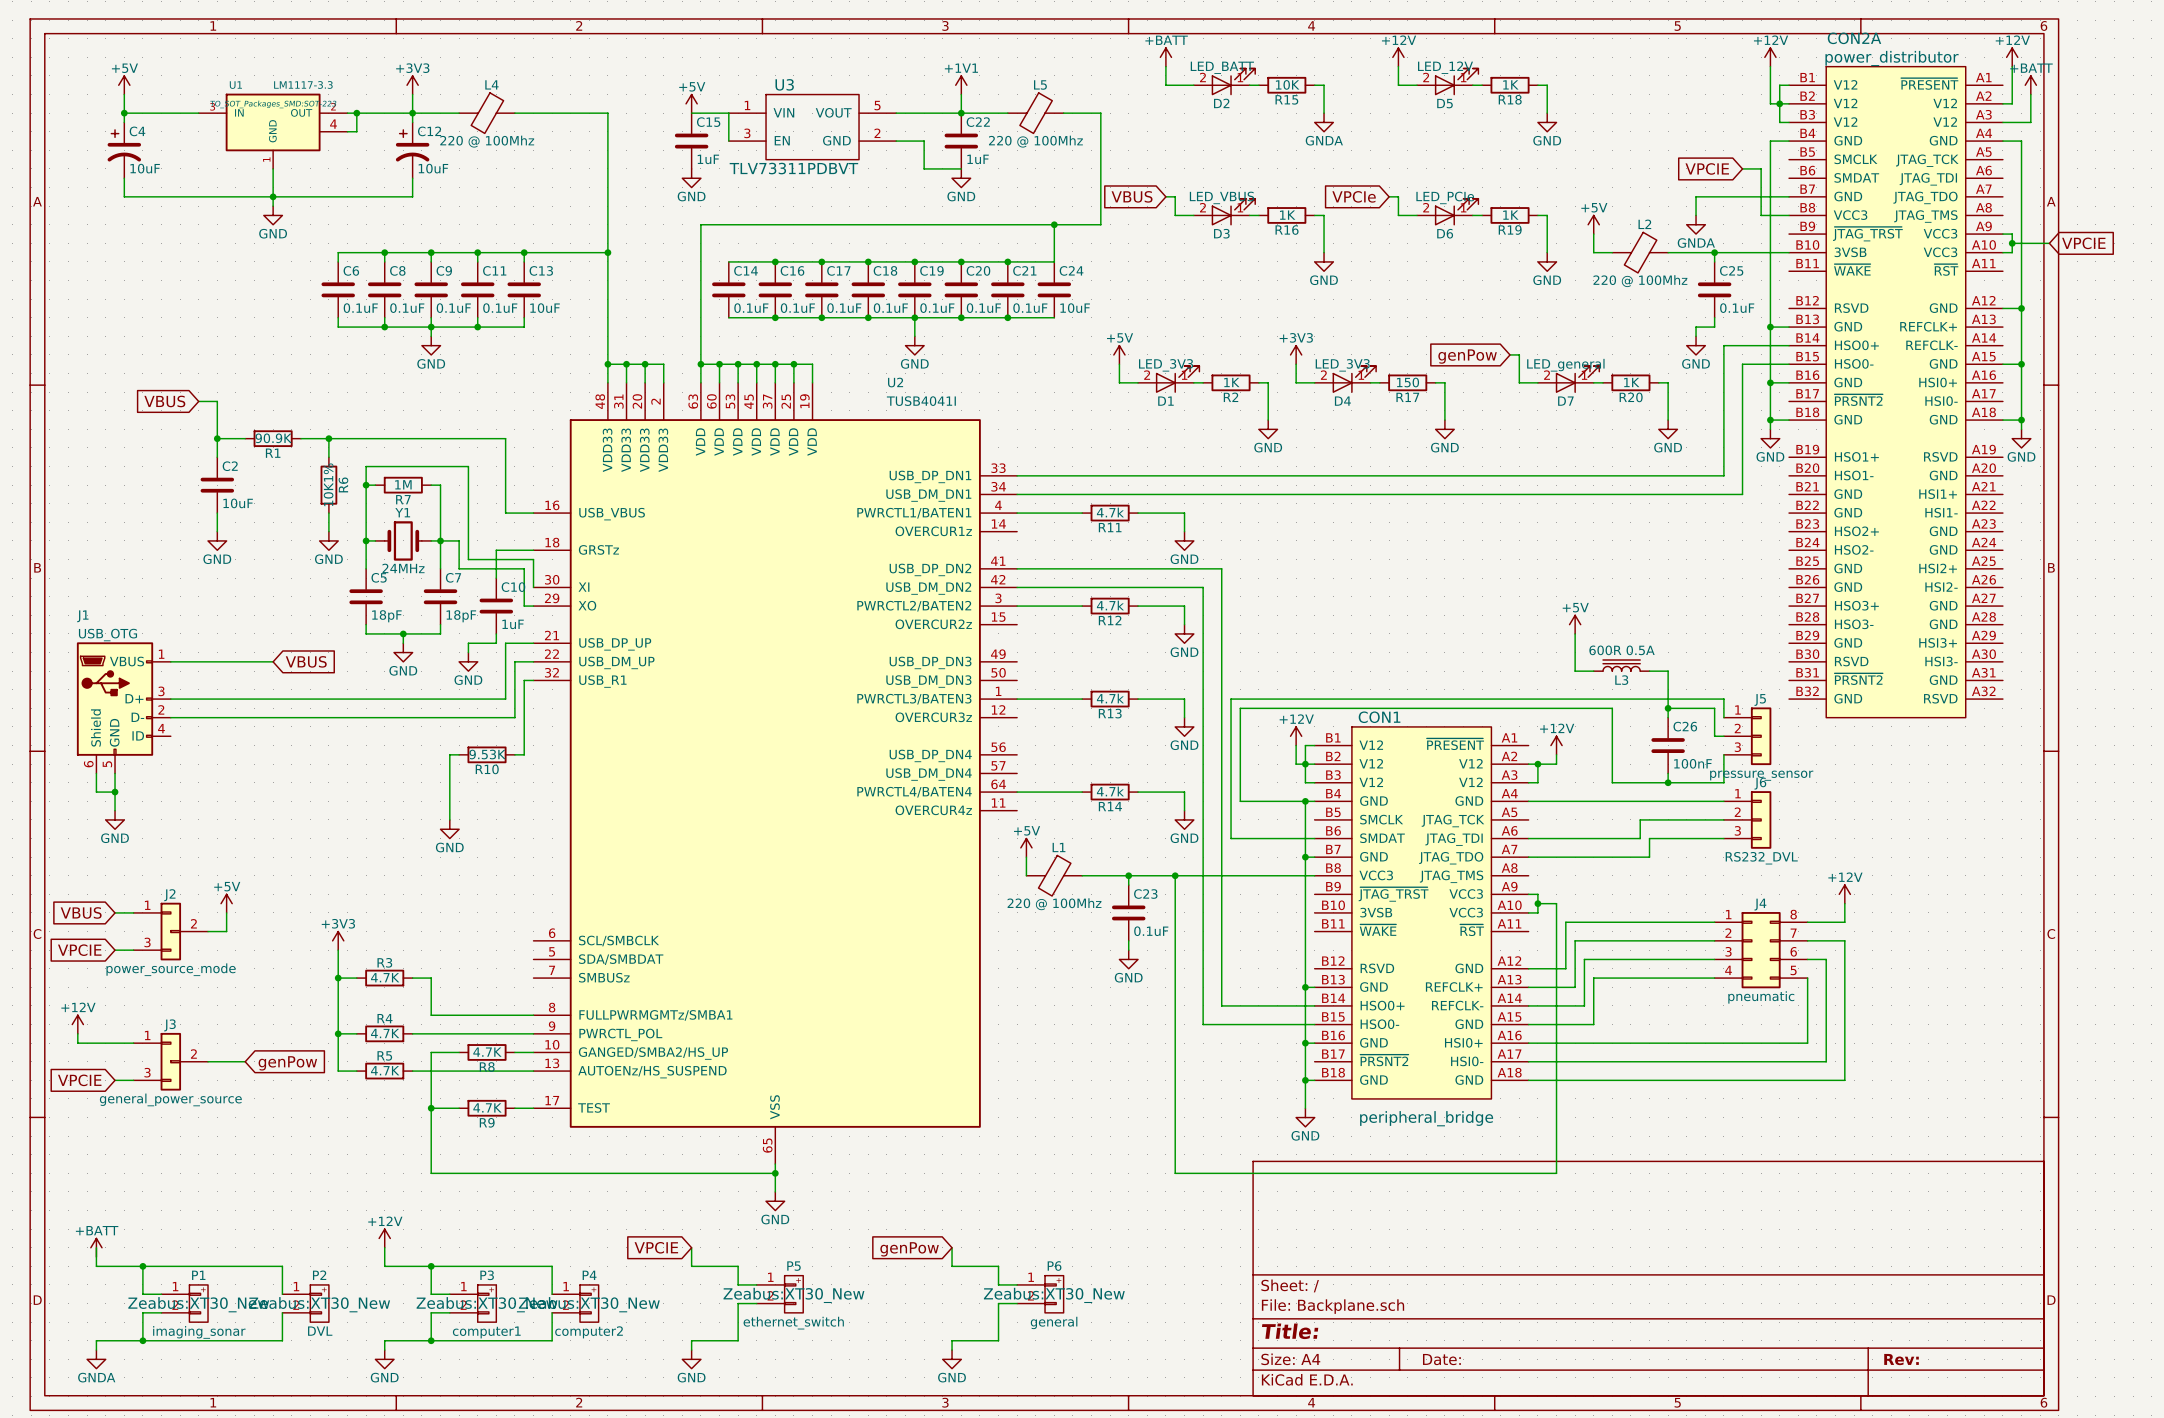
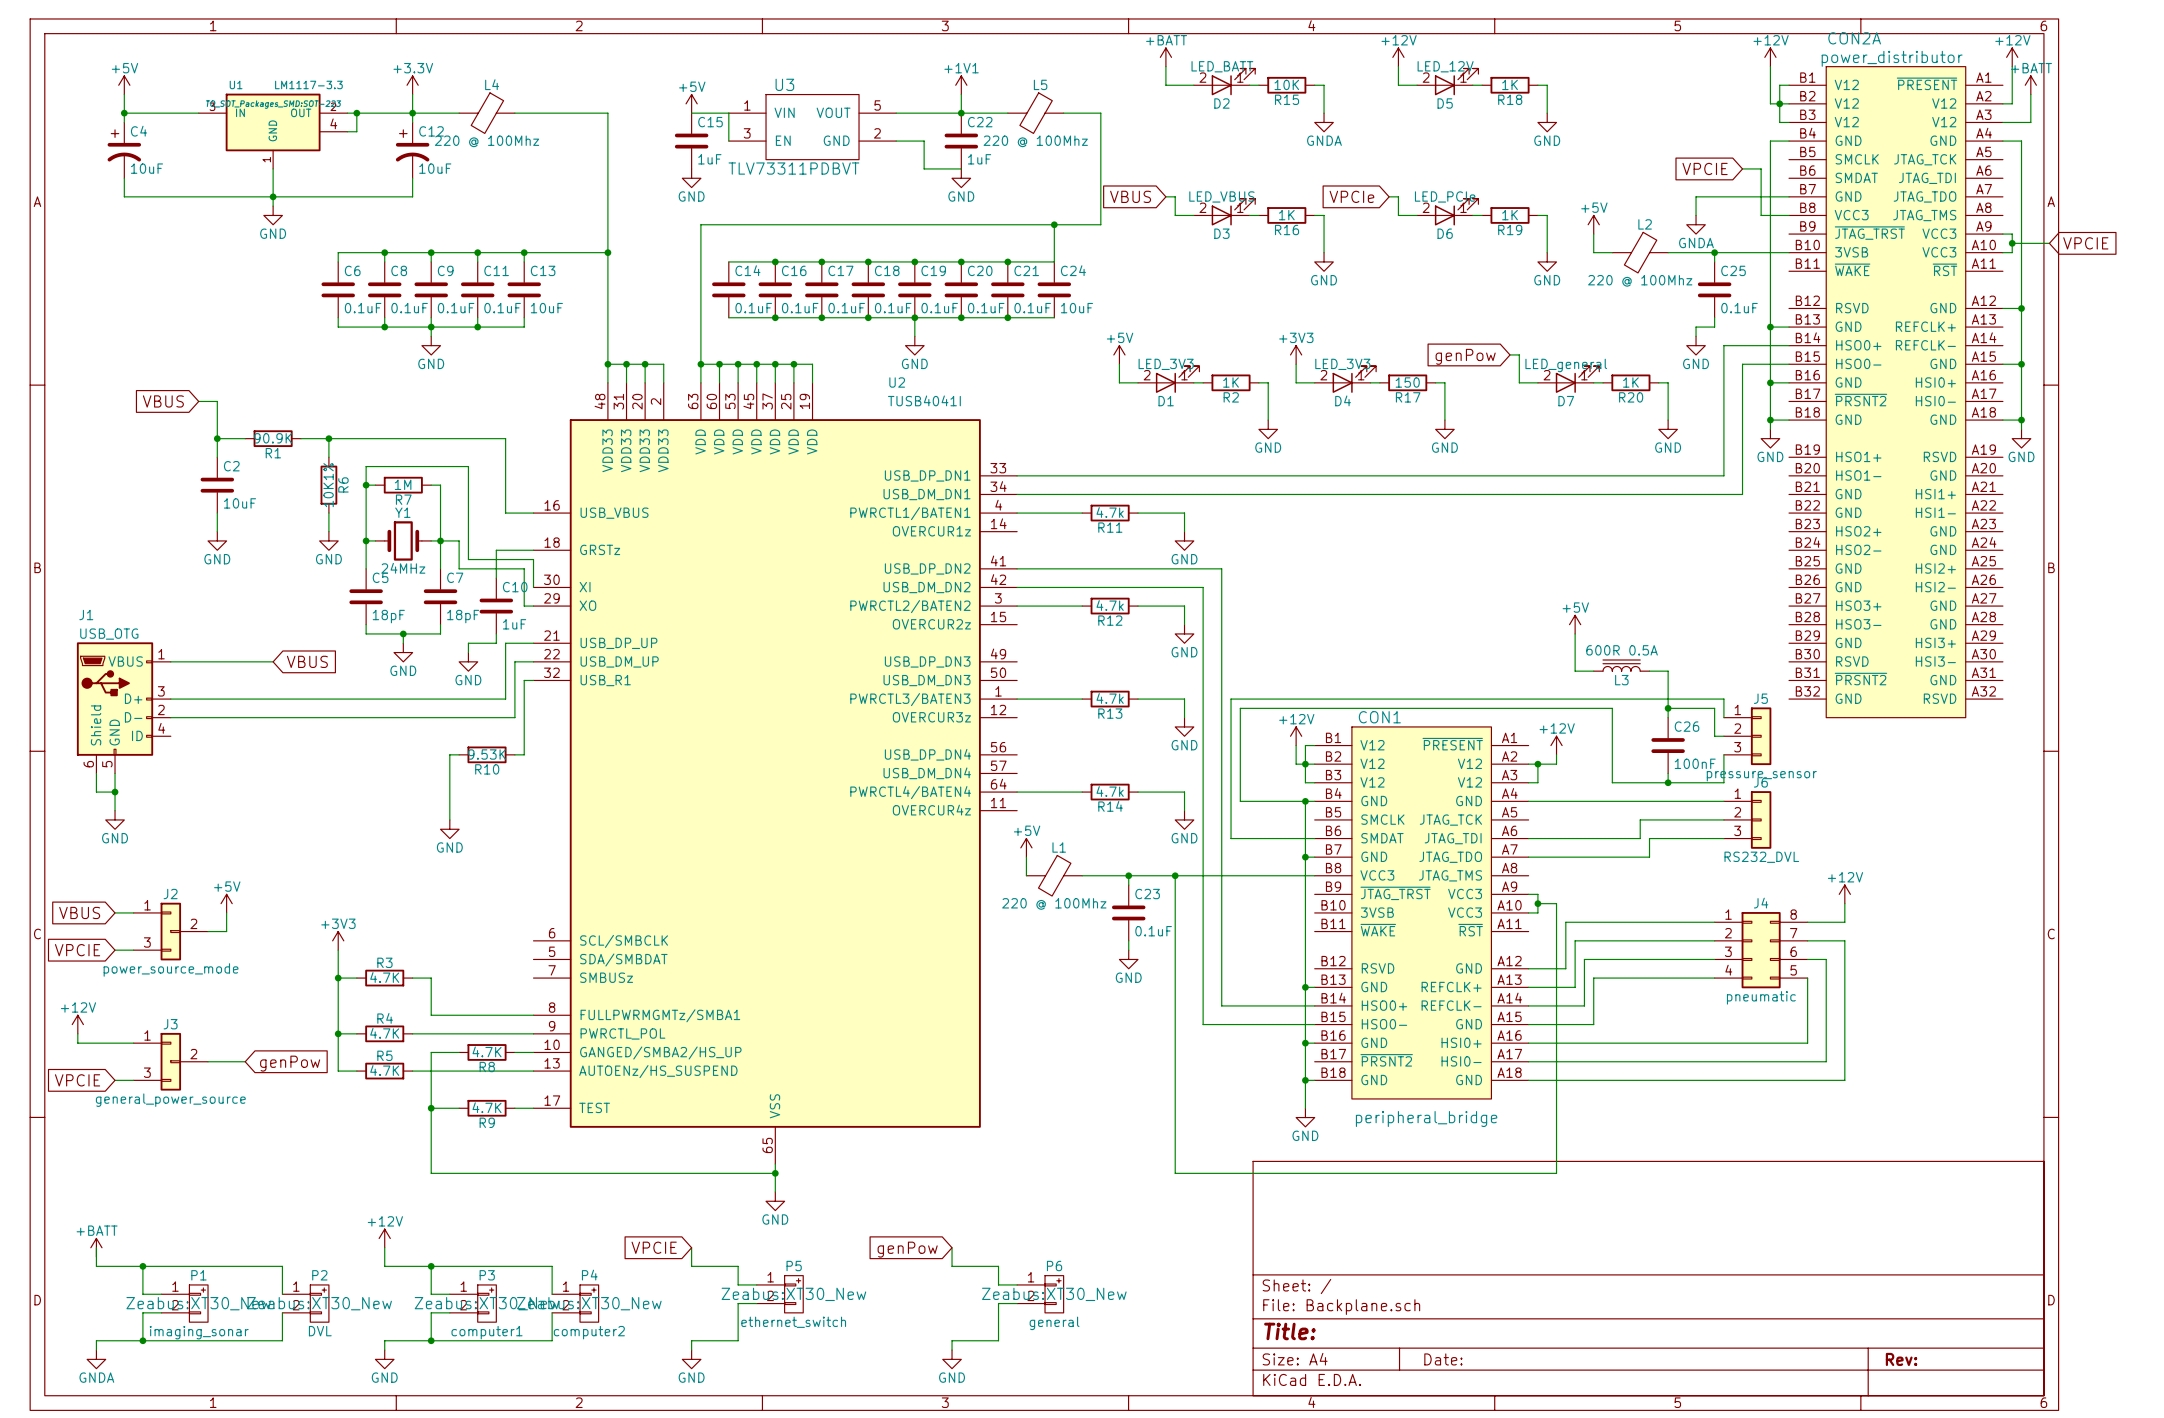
power symbol: +3V3 (412, 85) -> +3.3V (412, 85)

